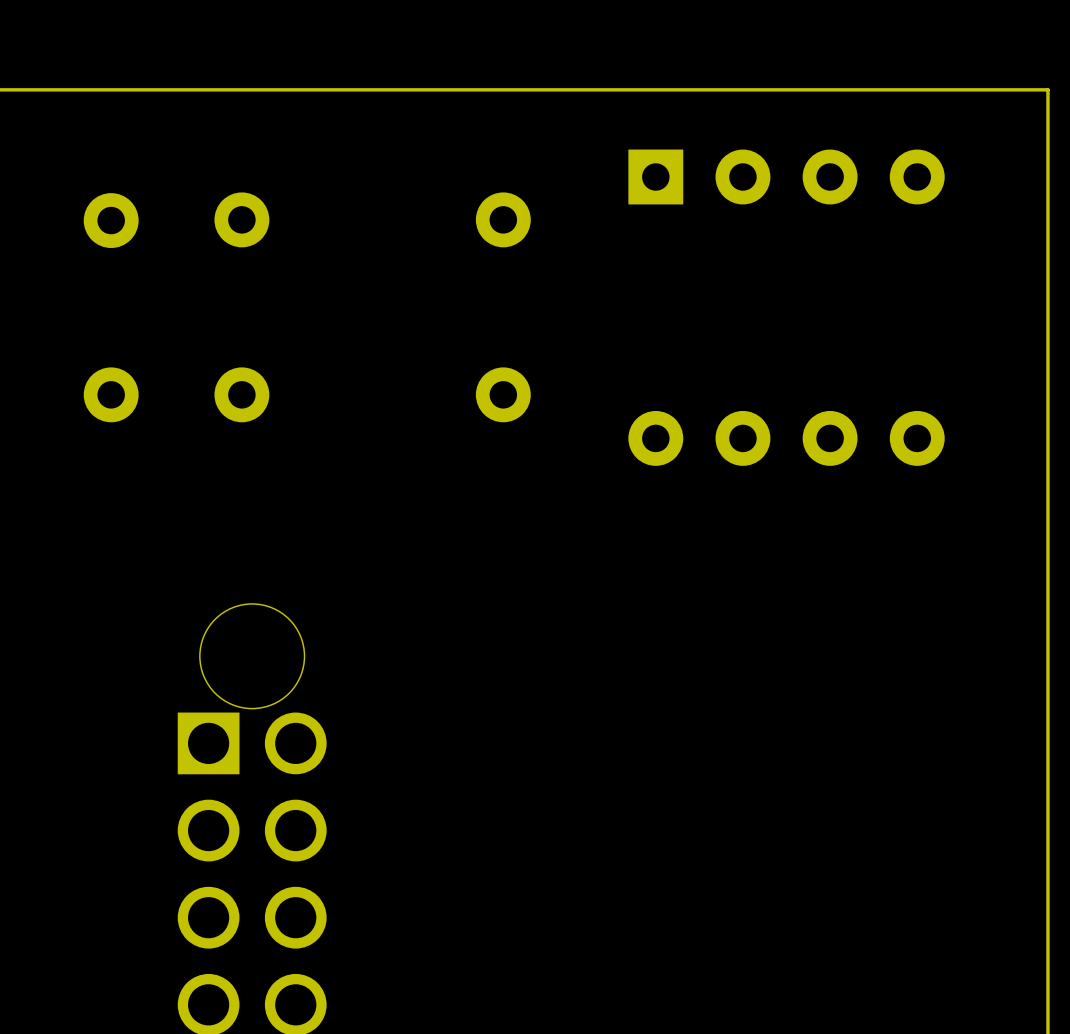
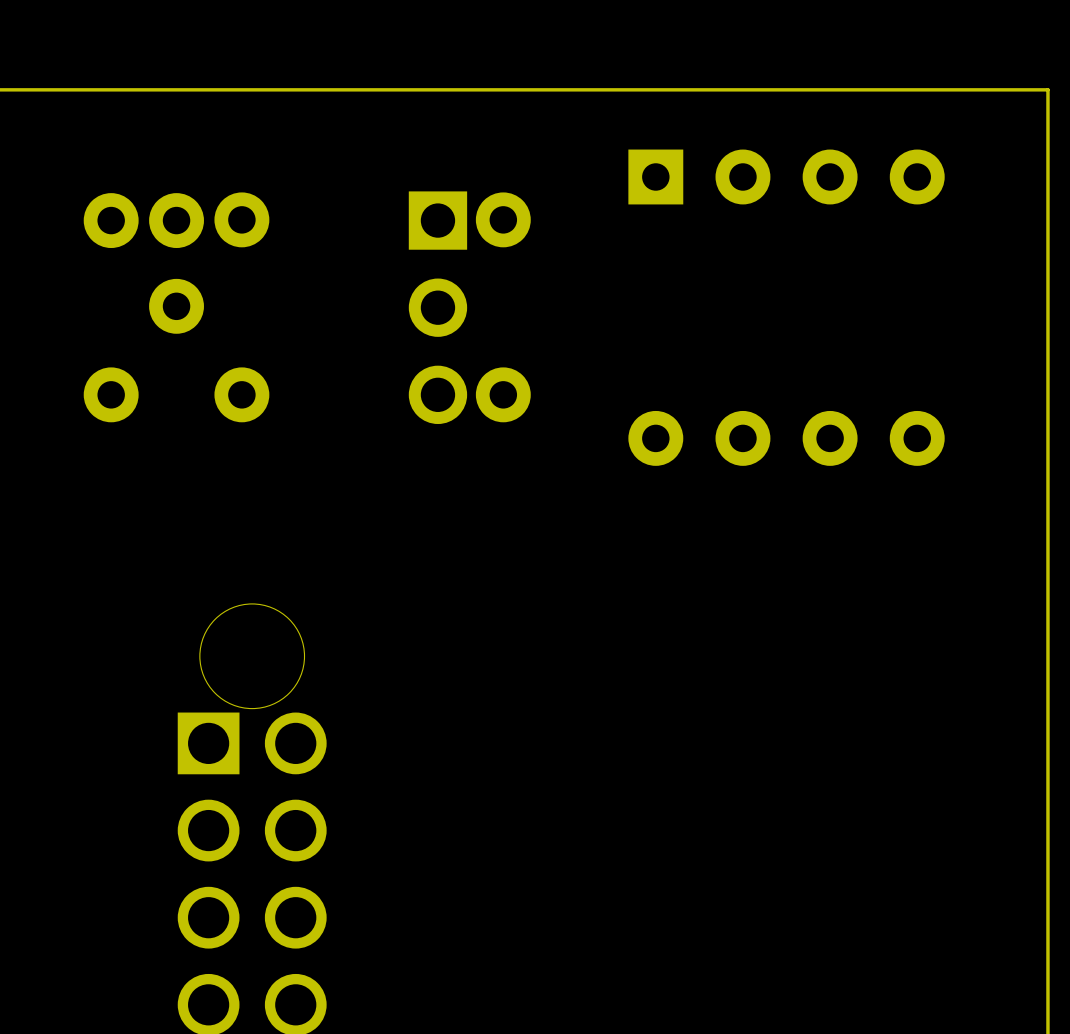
part: none -> (176, 263)
part: none -> (437, 307)

